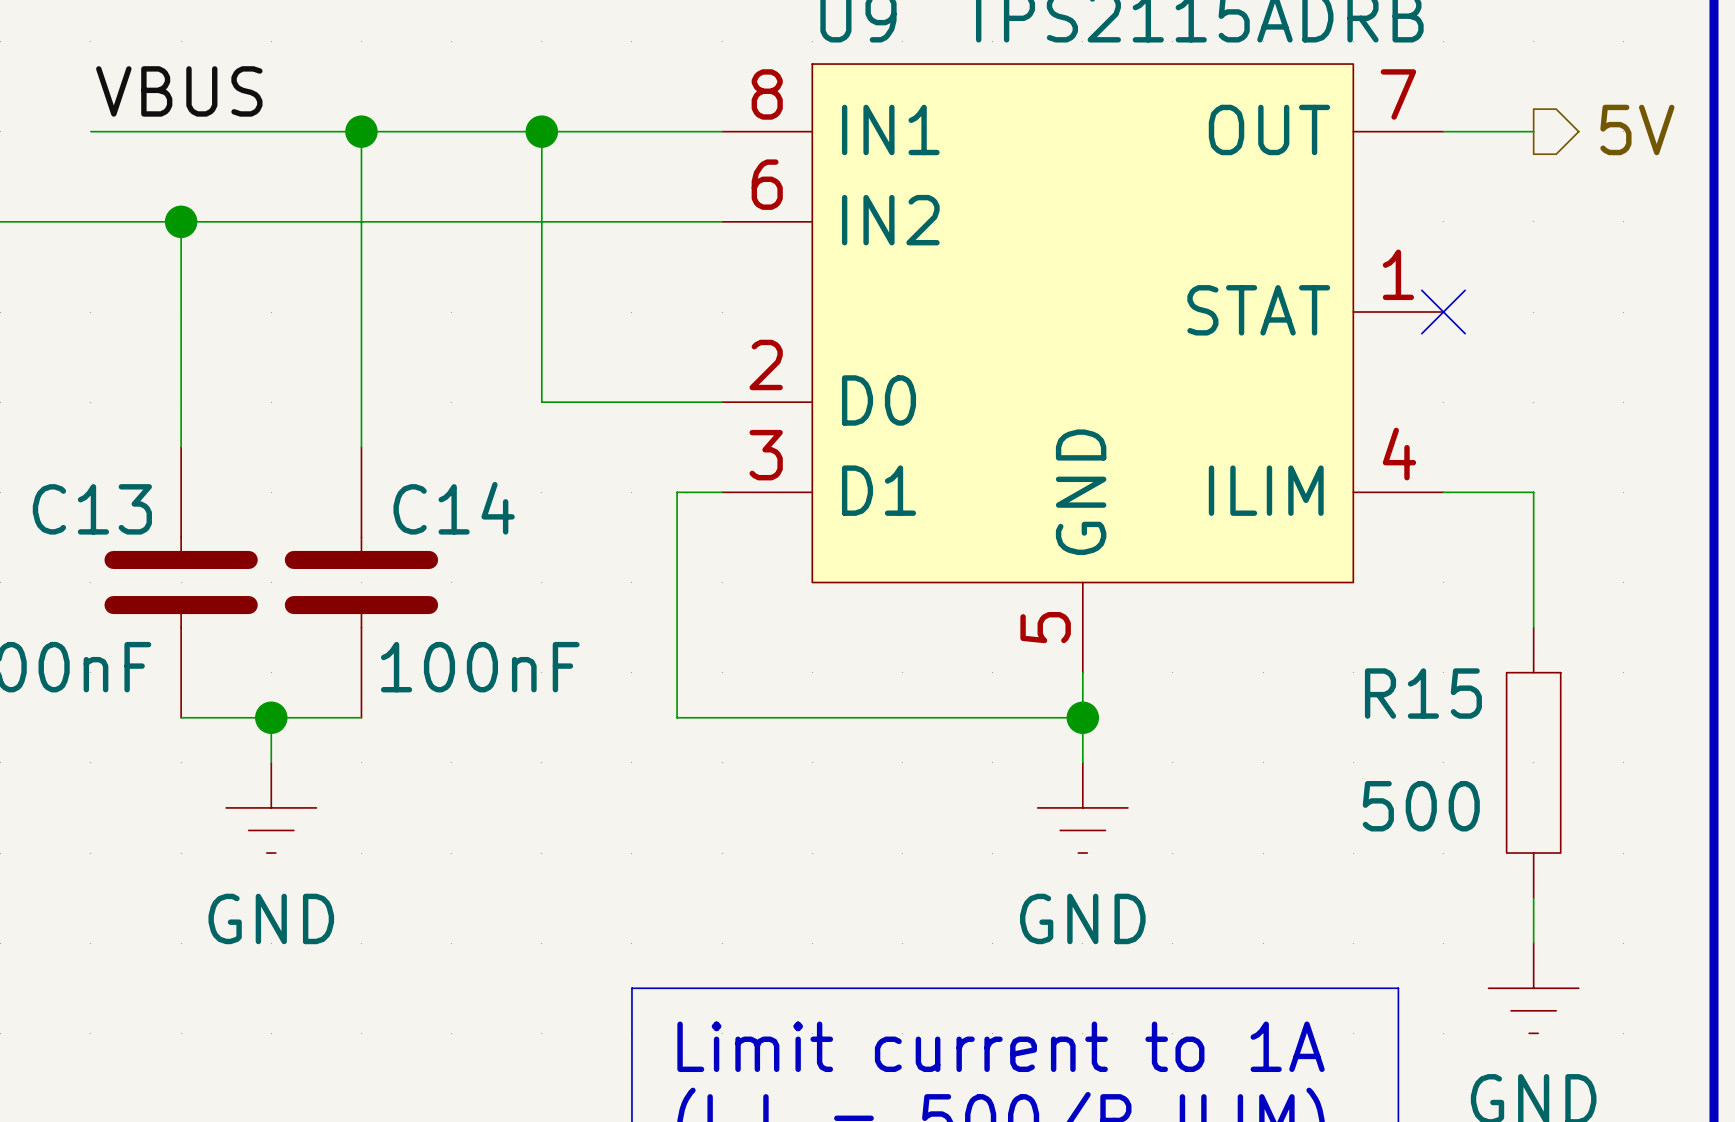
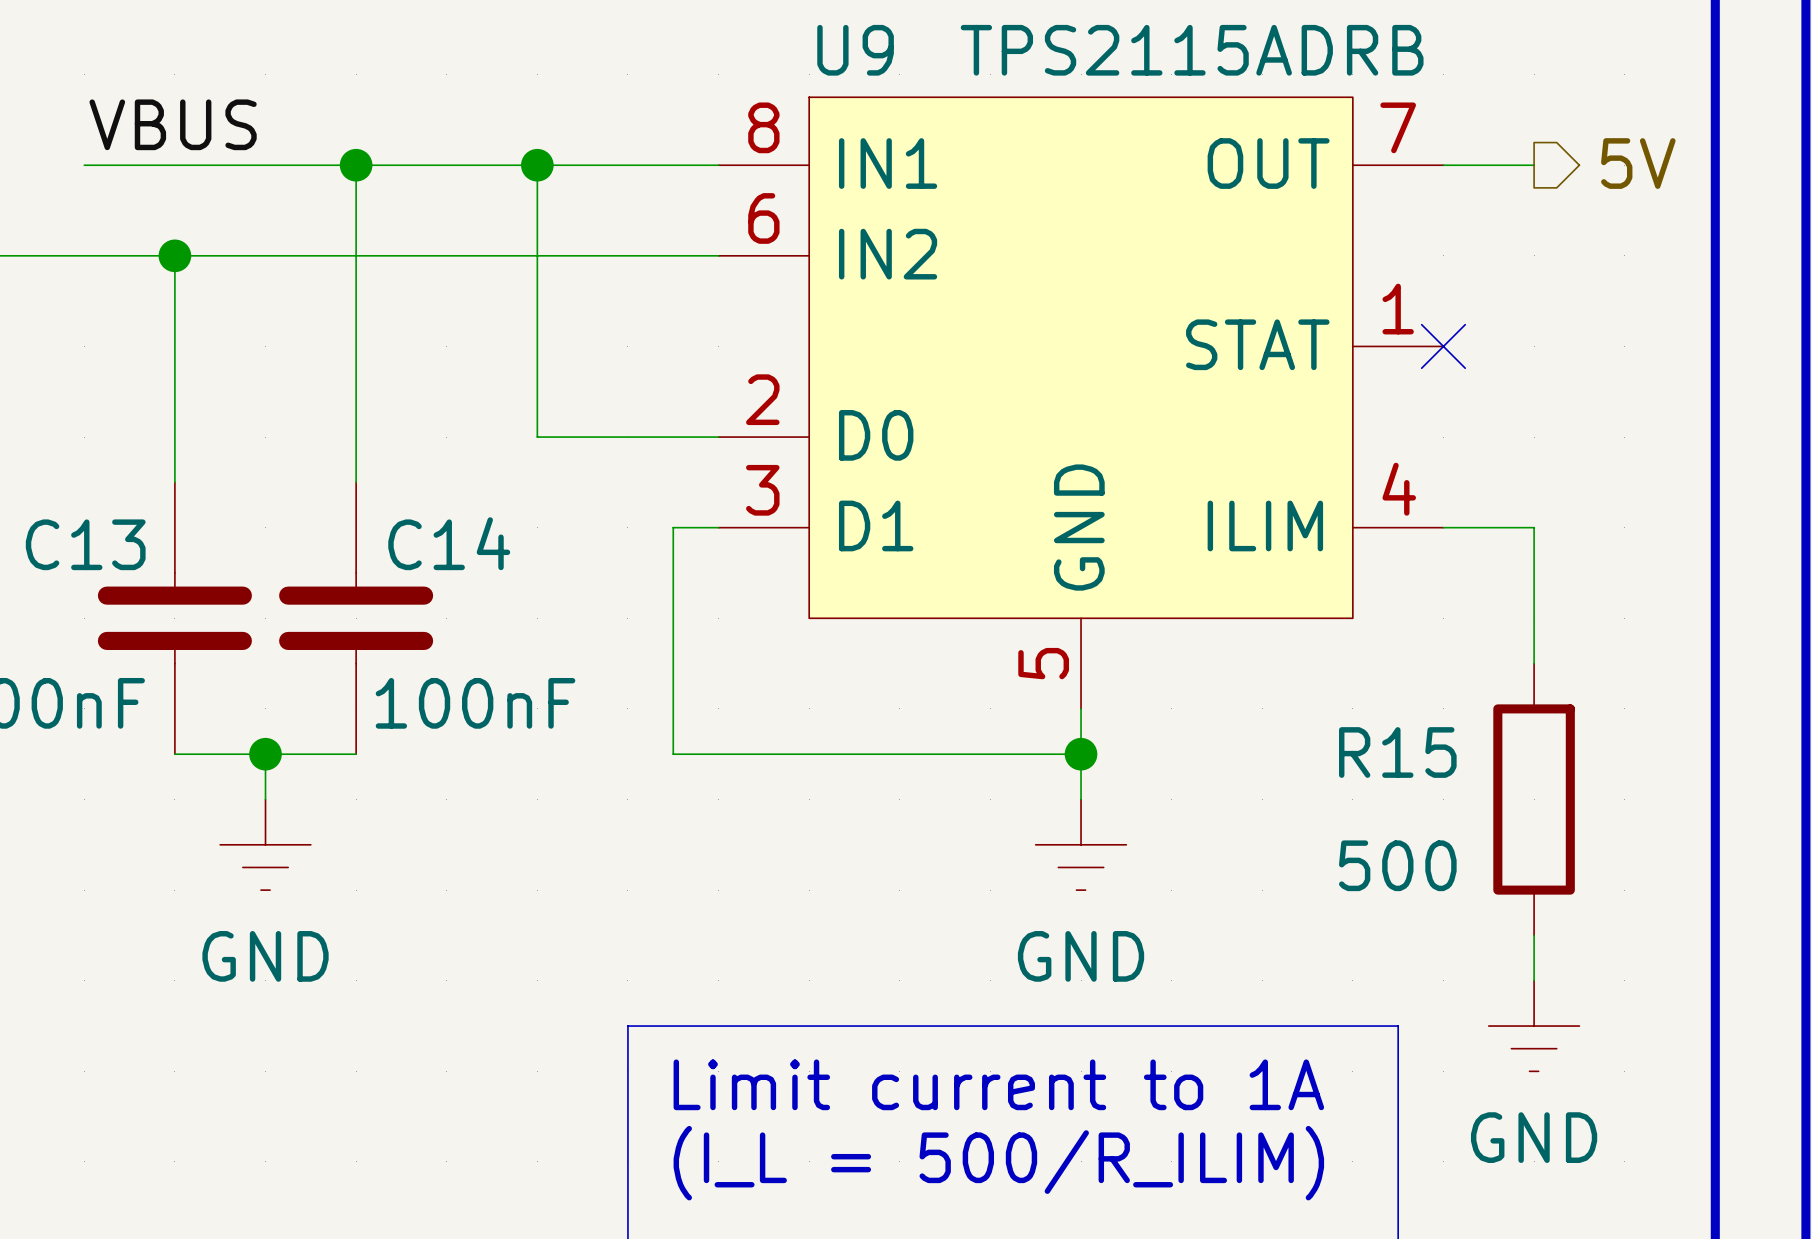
R15 symbol: [1506, 627, 1561, 899] -> [1493, 663, 1575, 936]
R15 name position: R15 (1423, 693) -> R15 (1397, 752)
R15 value position: 500 (1421, 806) -> 500 (1397, 865)

